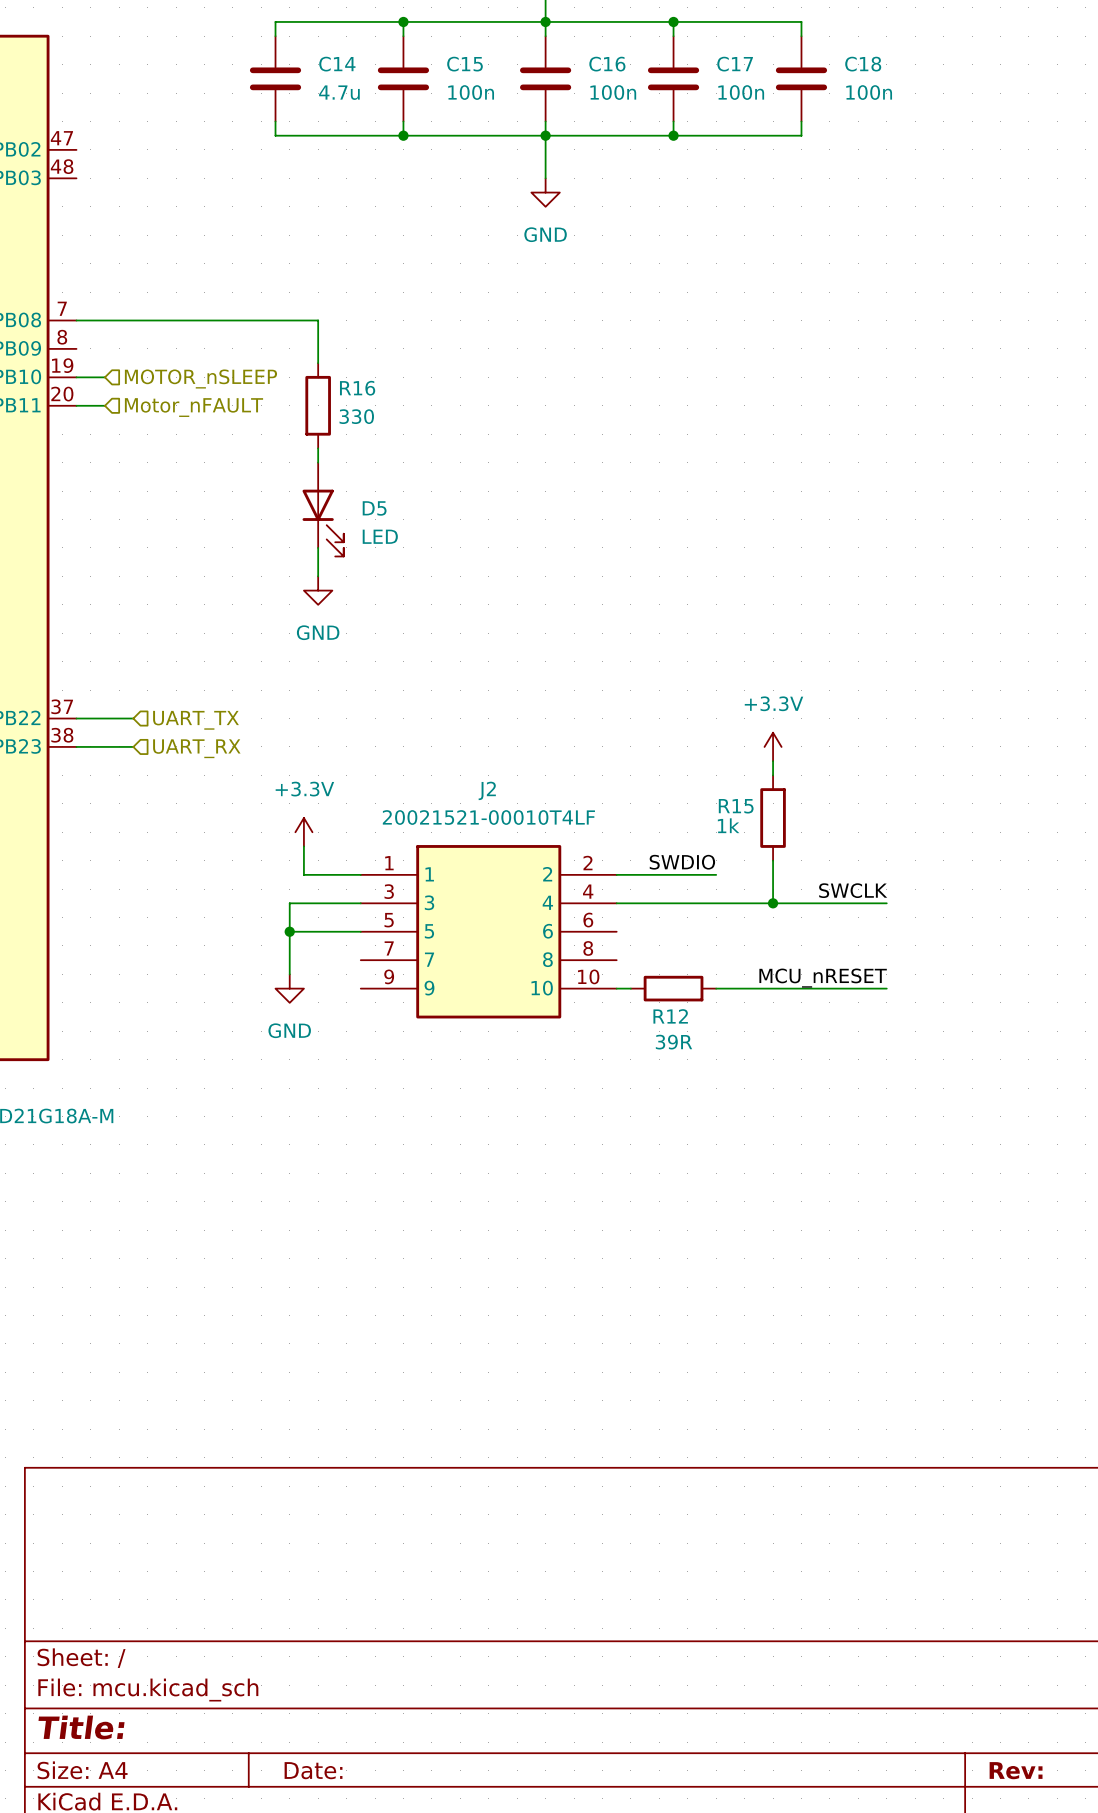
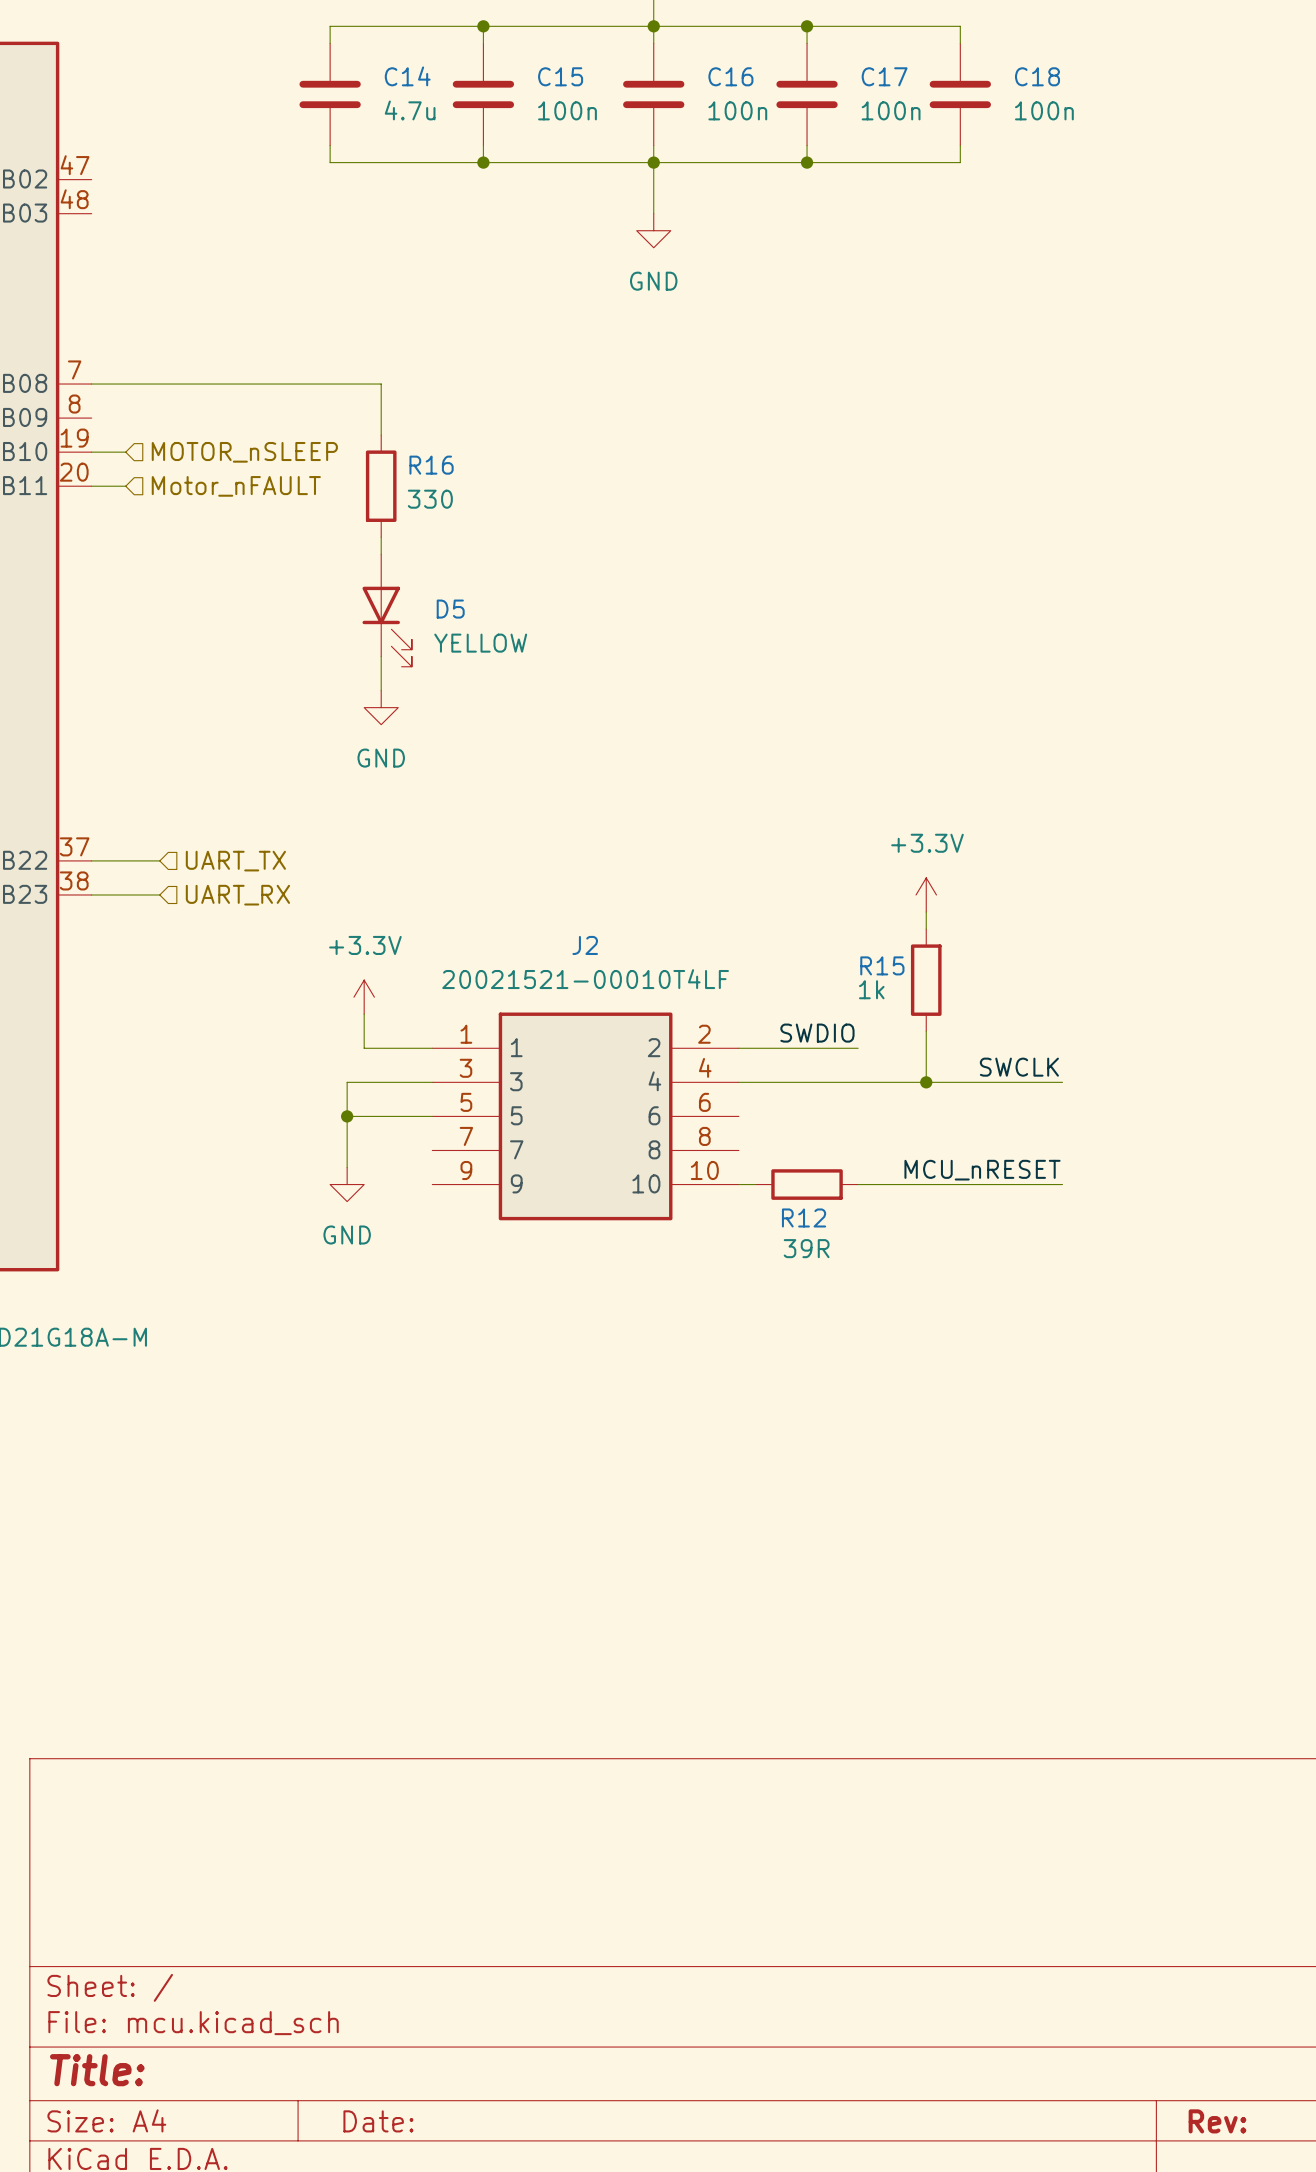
D5 value: LED (380, 536) -> YELLOW (480, 643)

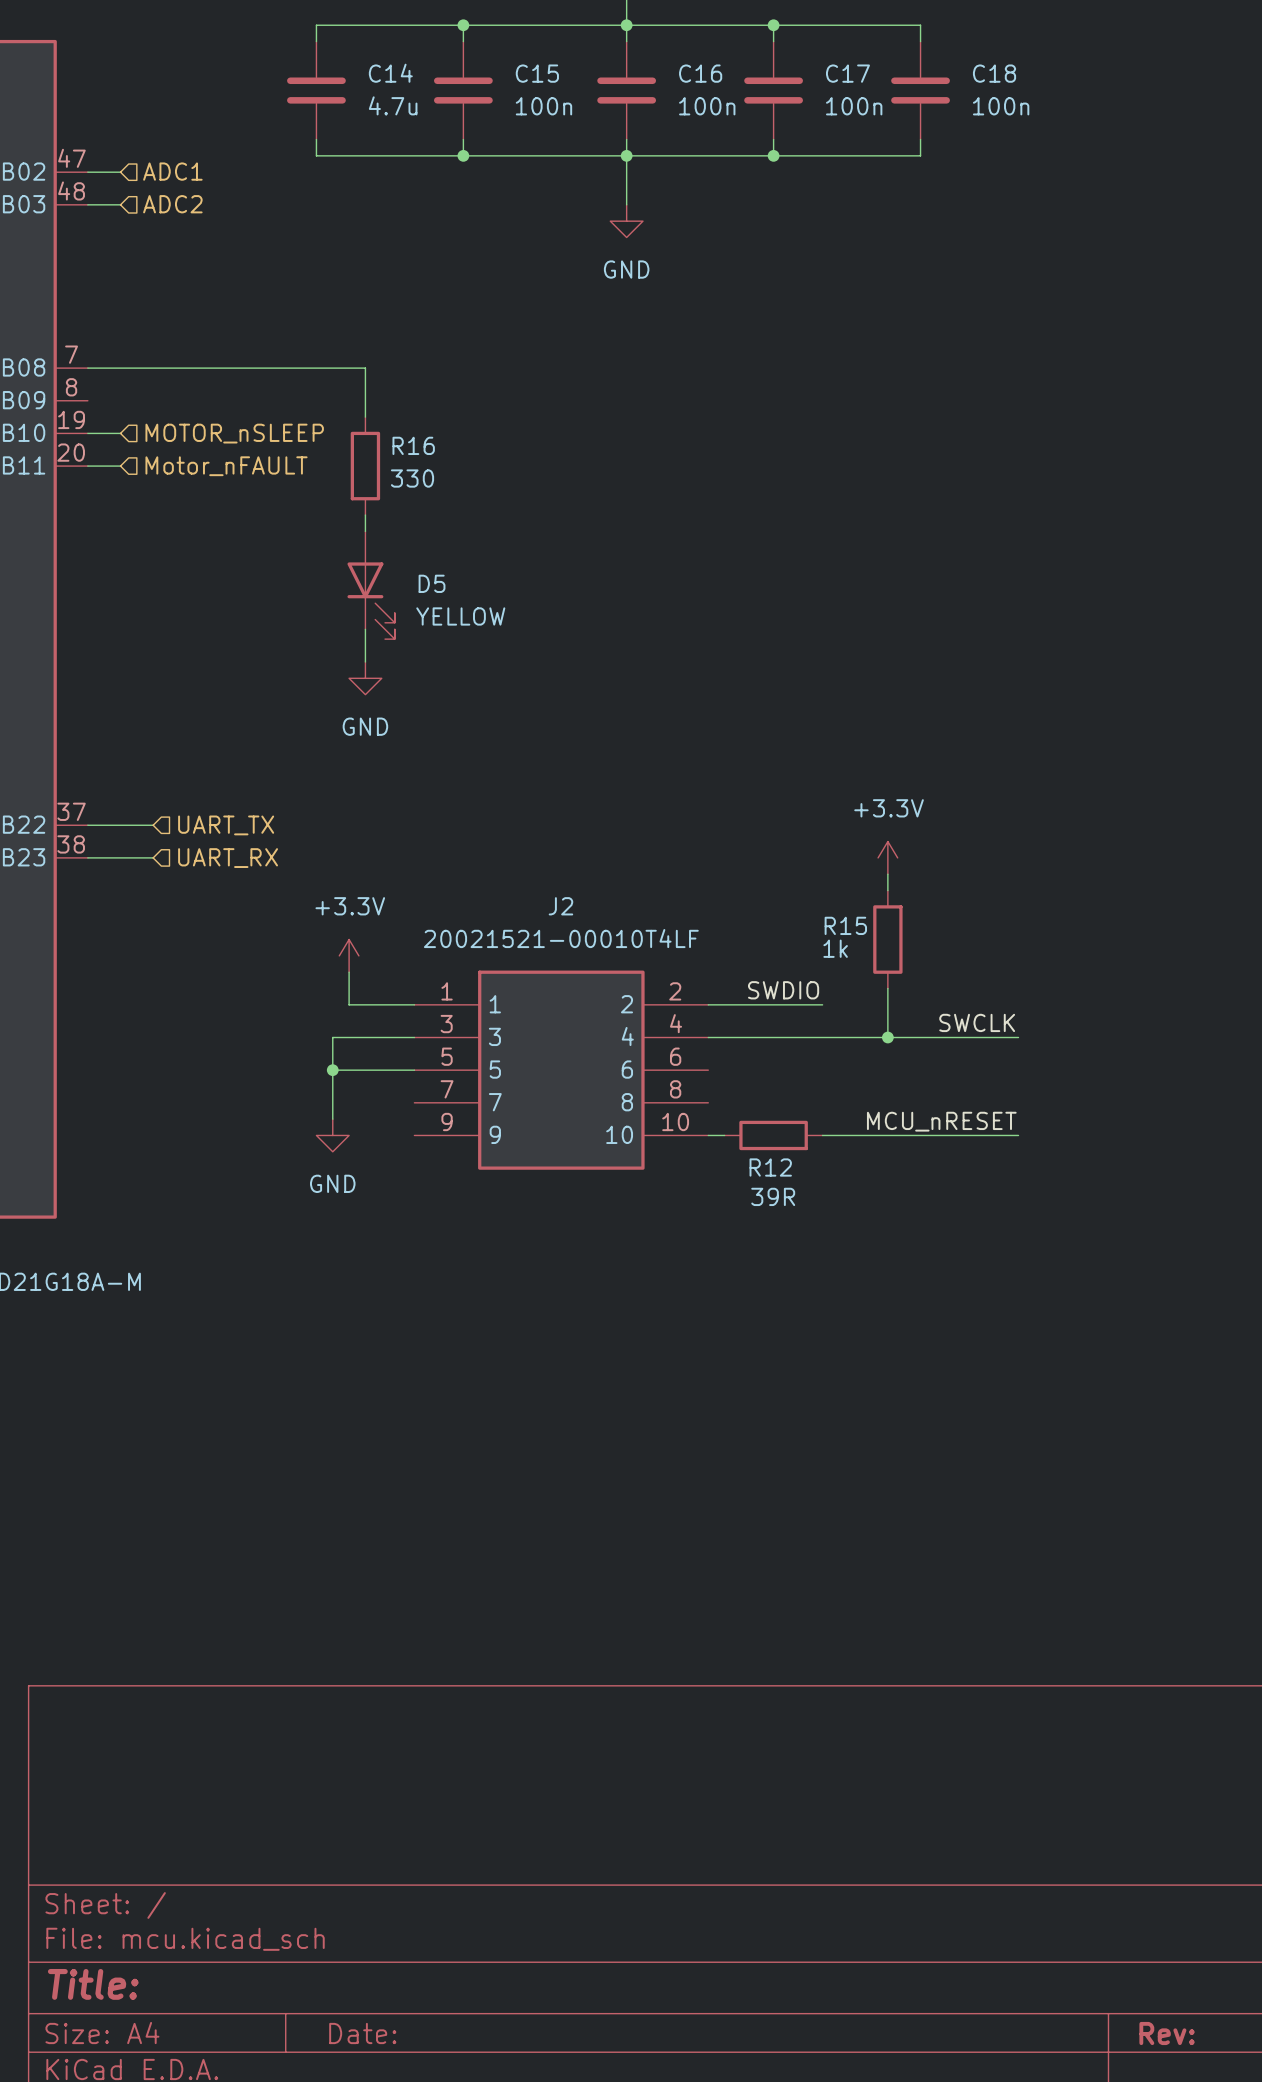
hierarchical label: none -> ADC1 (172, 171)
wire: none -> (87, 172) (120, 172)
wire: none -> (87, 204) (120, 204)
hierarchical label: none -> ADC2 (172, 204)

